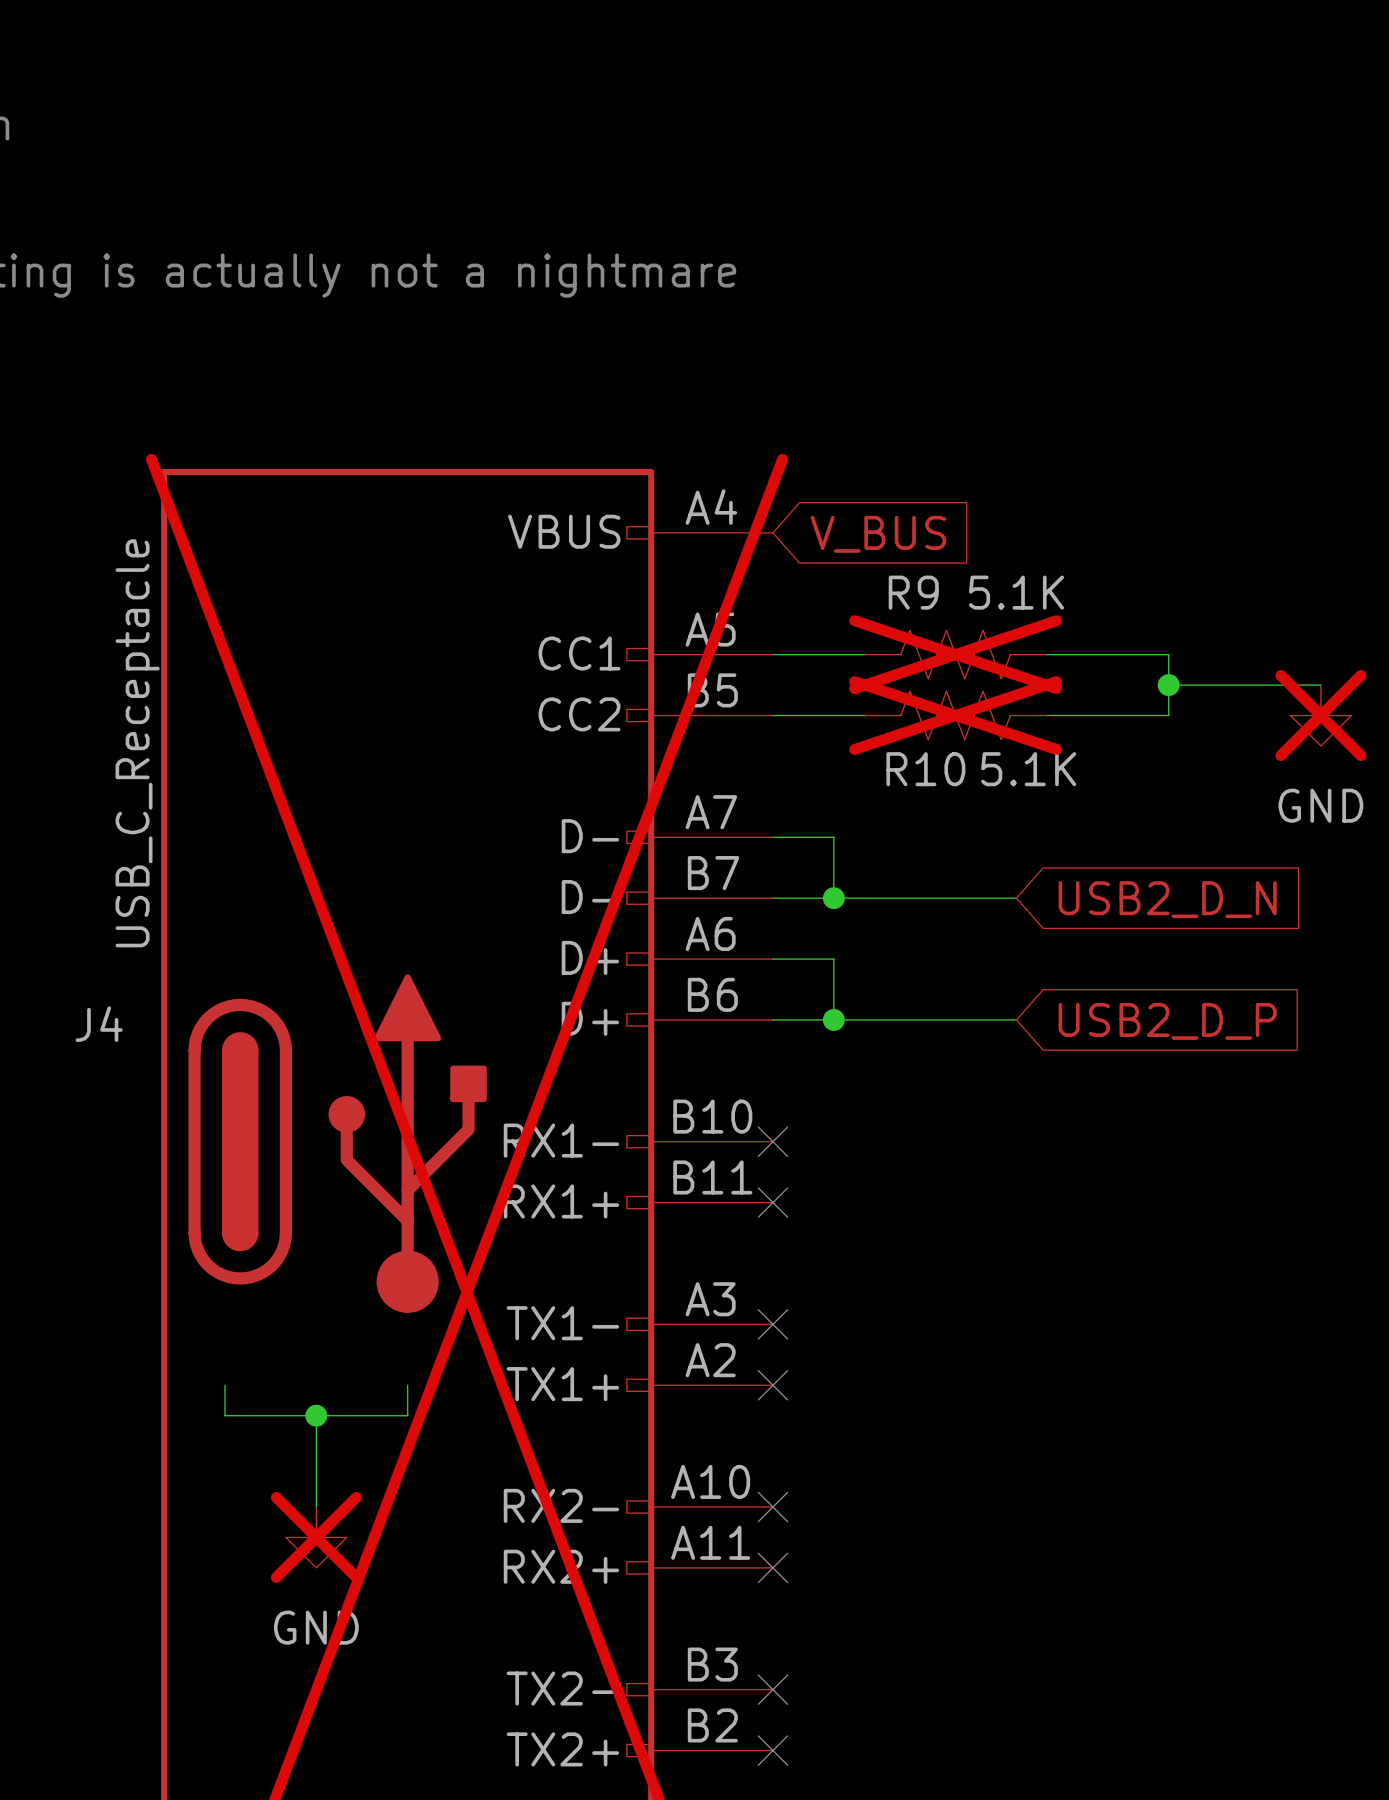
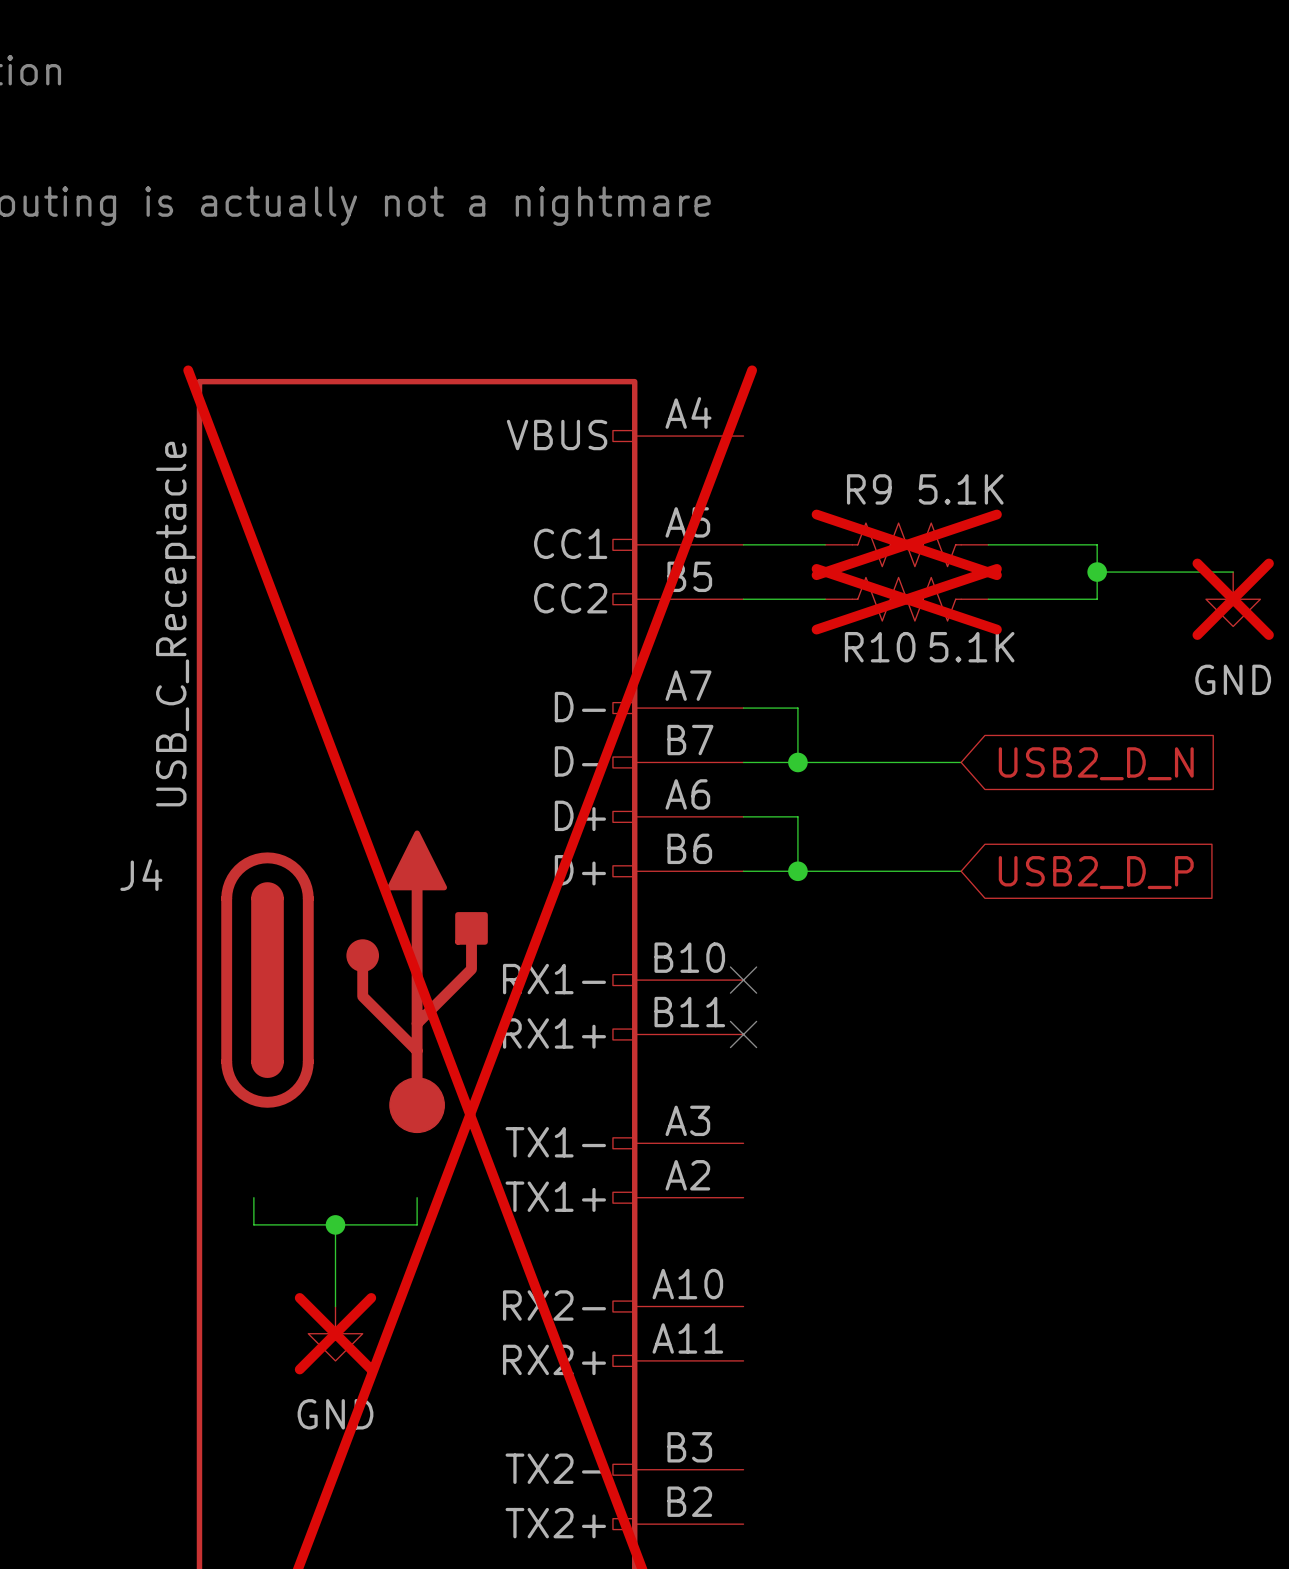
global label: V_BUS (878, 534) -> none
no-connect mark: (772, 1324) -> none
no-connect mark: (772, 1385) -> none
no-connect mark: (772, 1507) -> none
no-connect mark: (772, 1567) -> none
no-connect mark: (772, 1689) -> none
no-connect mark: (772, 1750) -> none

